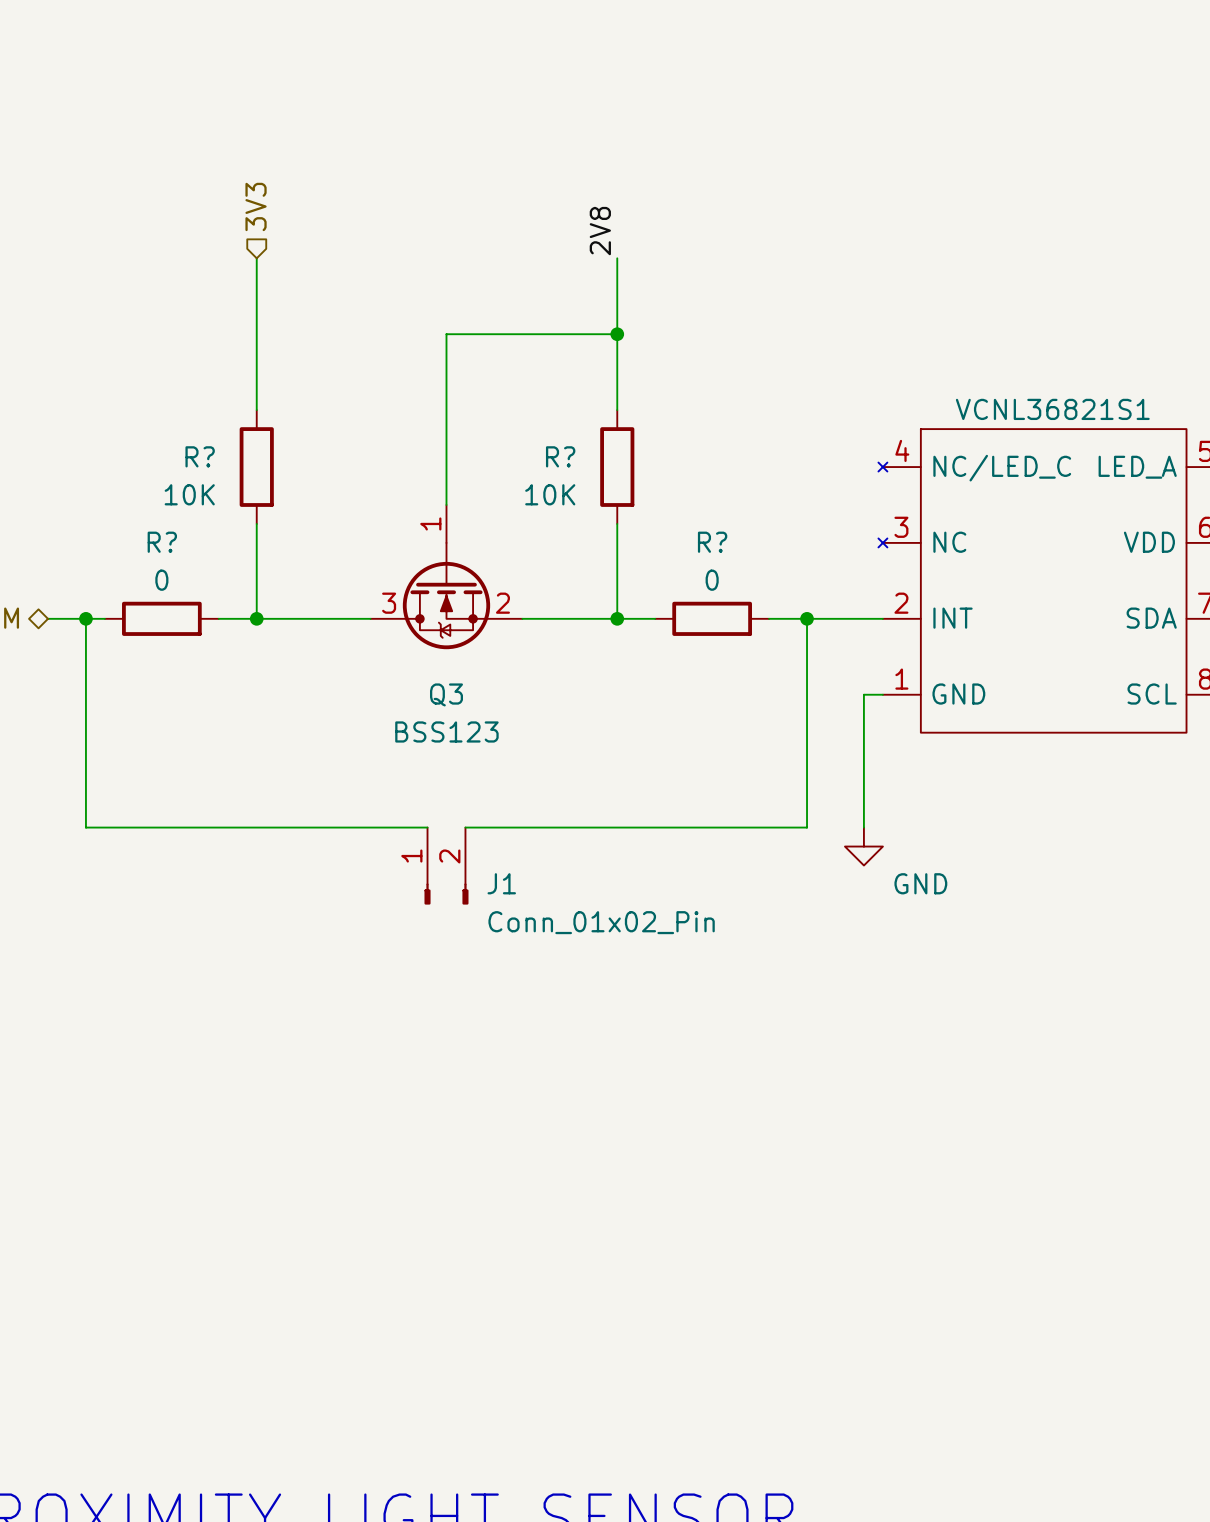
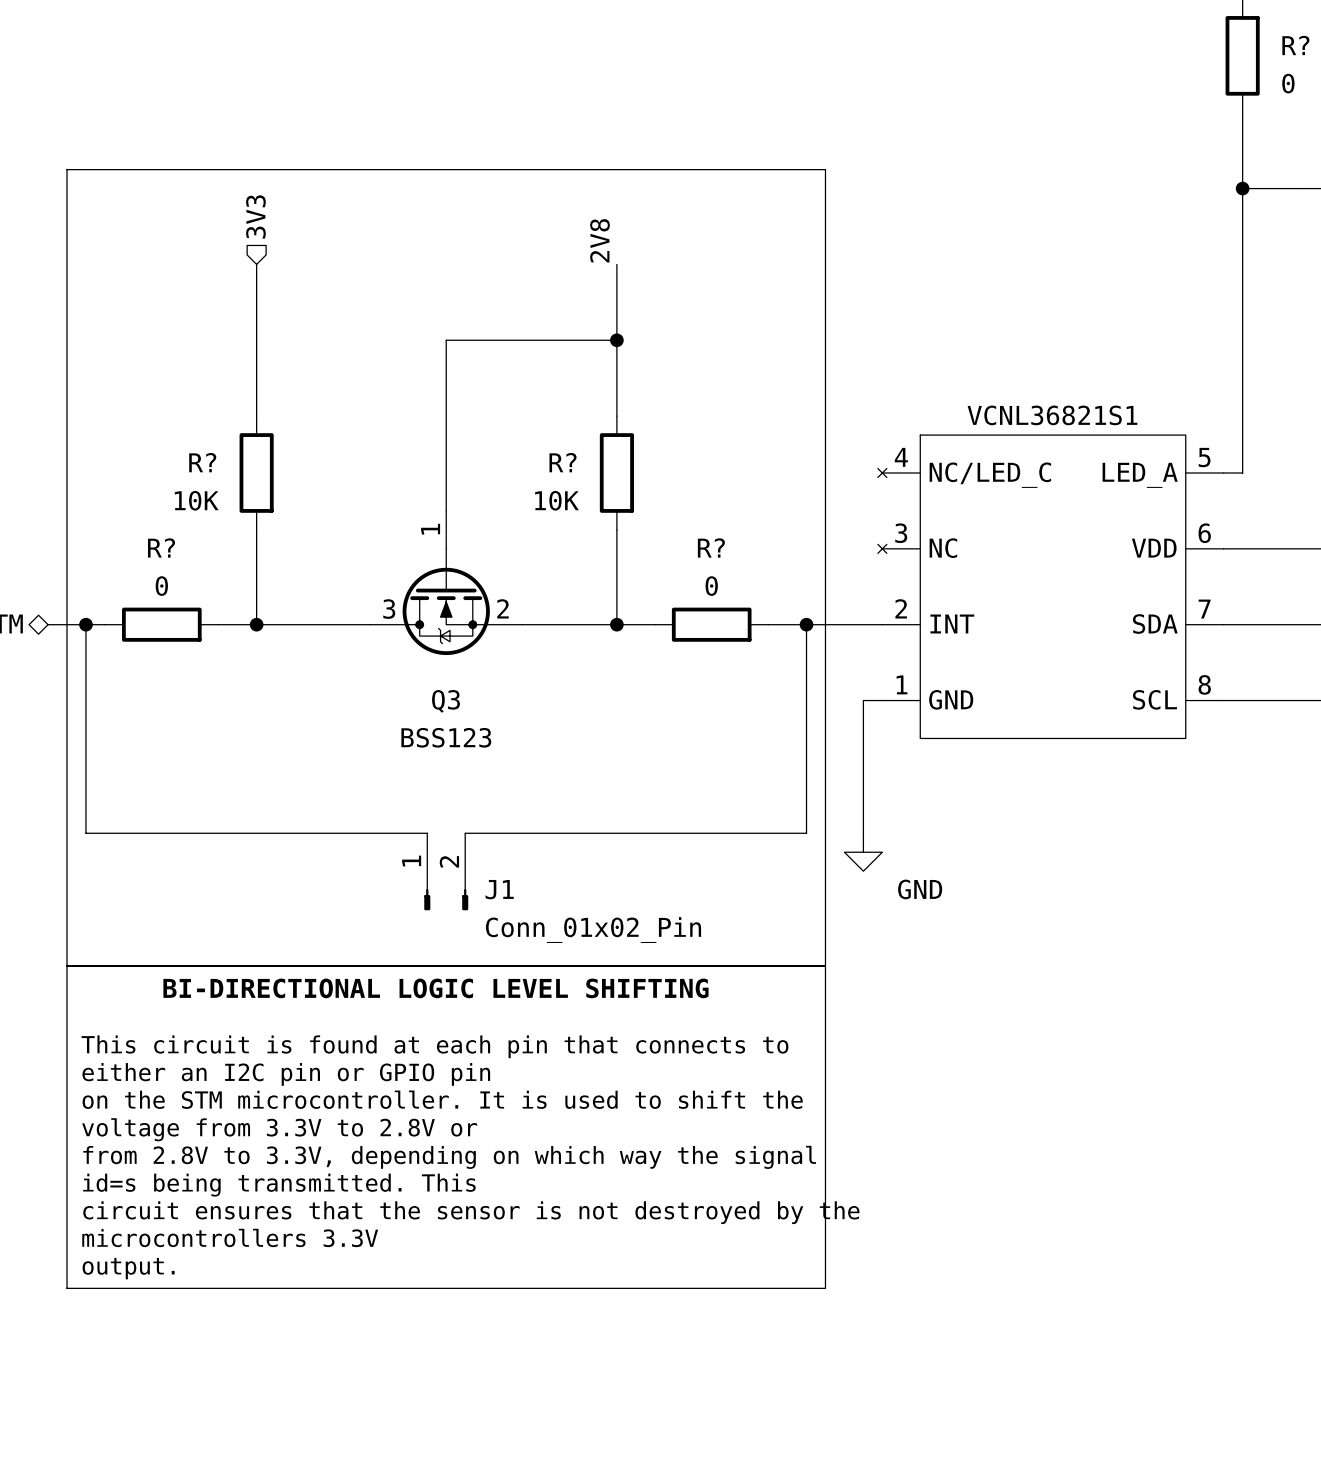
line: none -> (67, 169) (825, 169) (825, 1288) (67, 1288) (67, 169)
line: none -> (67, 966) (825, 966)
text: none -> BI-DIRECTIONAL LOGIC LEVEL SHIFTING (435, 988)
text: none -> This circuit is found at each pin that connects to (434, 1046)
text: none -> either an I2C pin or GPIO pin (286, 1074)
text: none -> on the STM microcontroller. It is used to shift the (442, 1099)
text: none -> voltage from 3.3V to 2.8V or (279, 1129)
text: none -> from 2.8V to 3.3V, depending on which way the signal (449, 1157)
text: none -> id=s being transmitted. This (279, 1185)
text: none -> circuit ensures that the sensor is not destroyed by the (471, 1212)
text: none -> microcontrollers 3.3V (230, 1237)
text: none -> output. (128, 1268)

